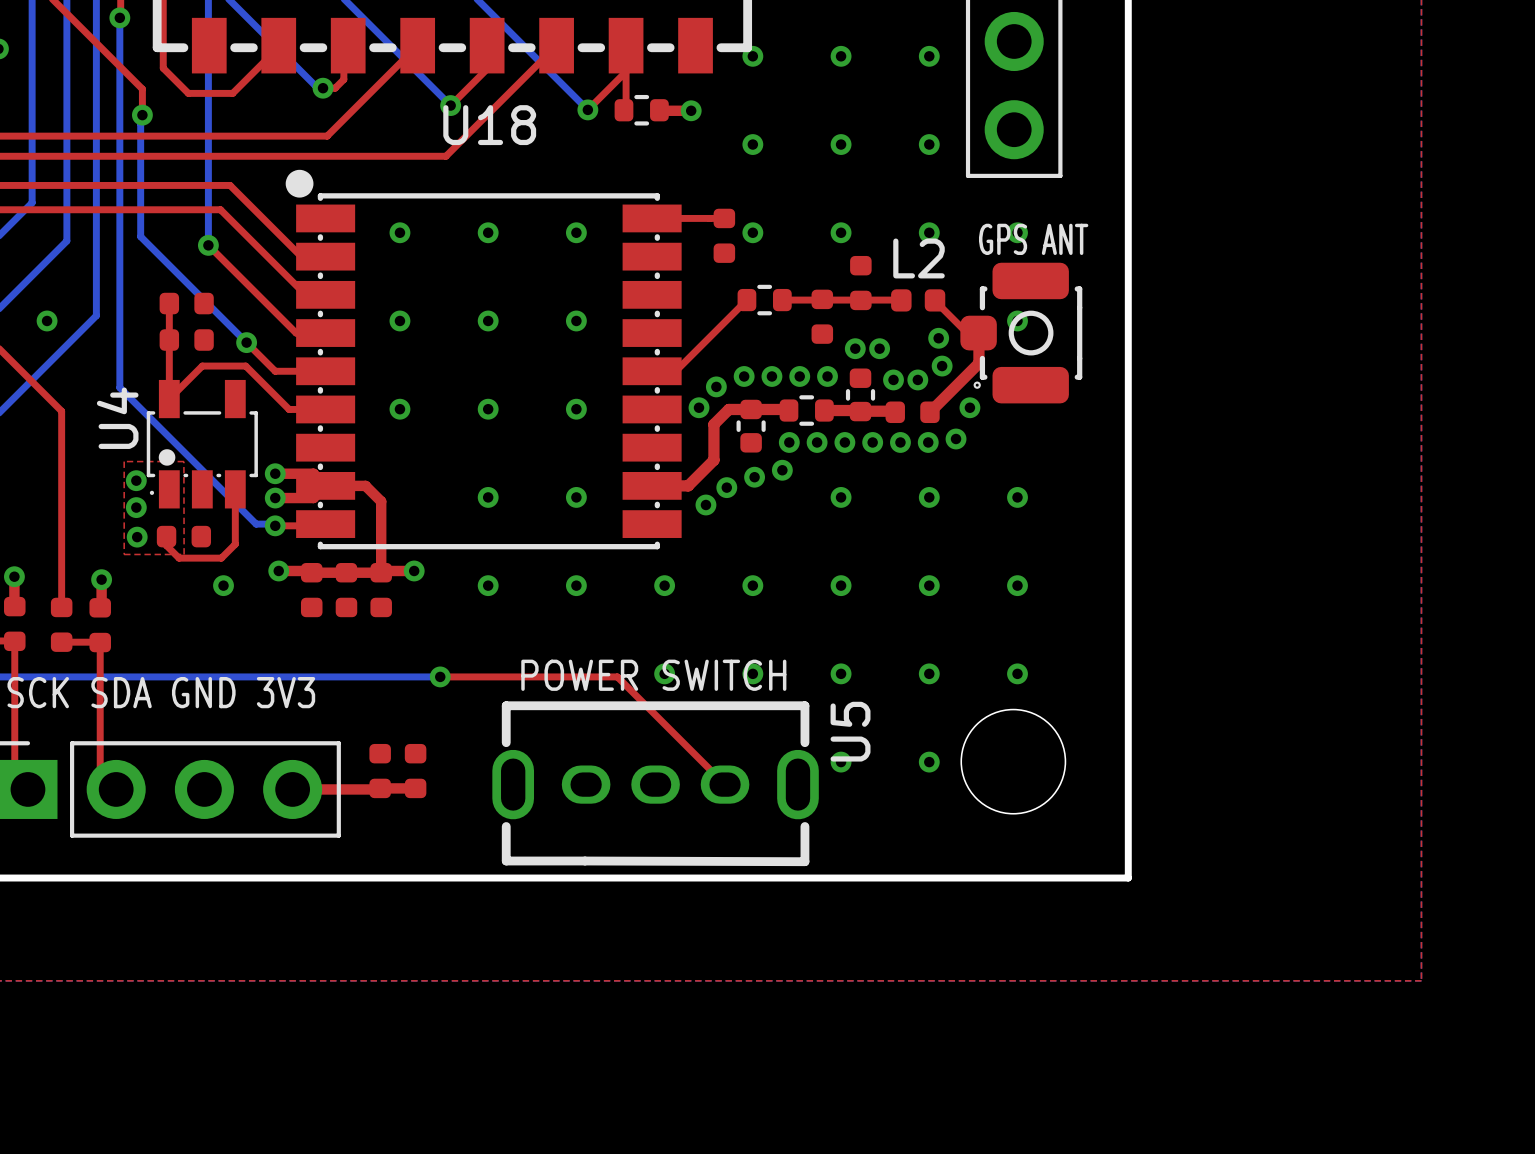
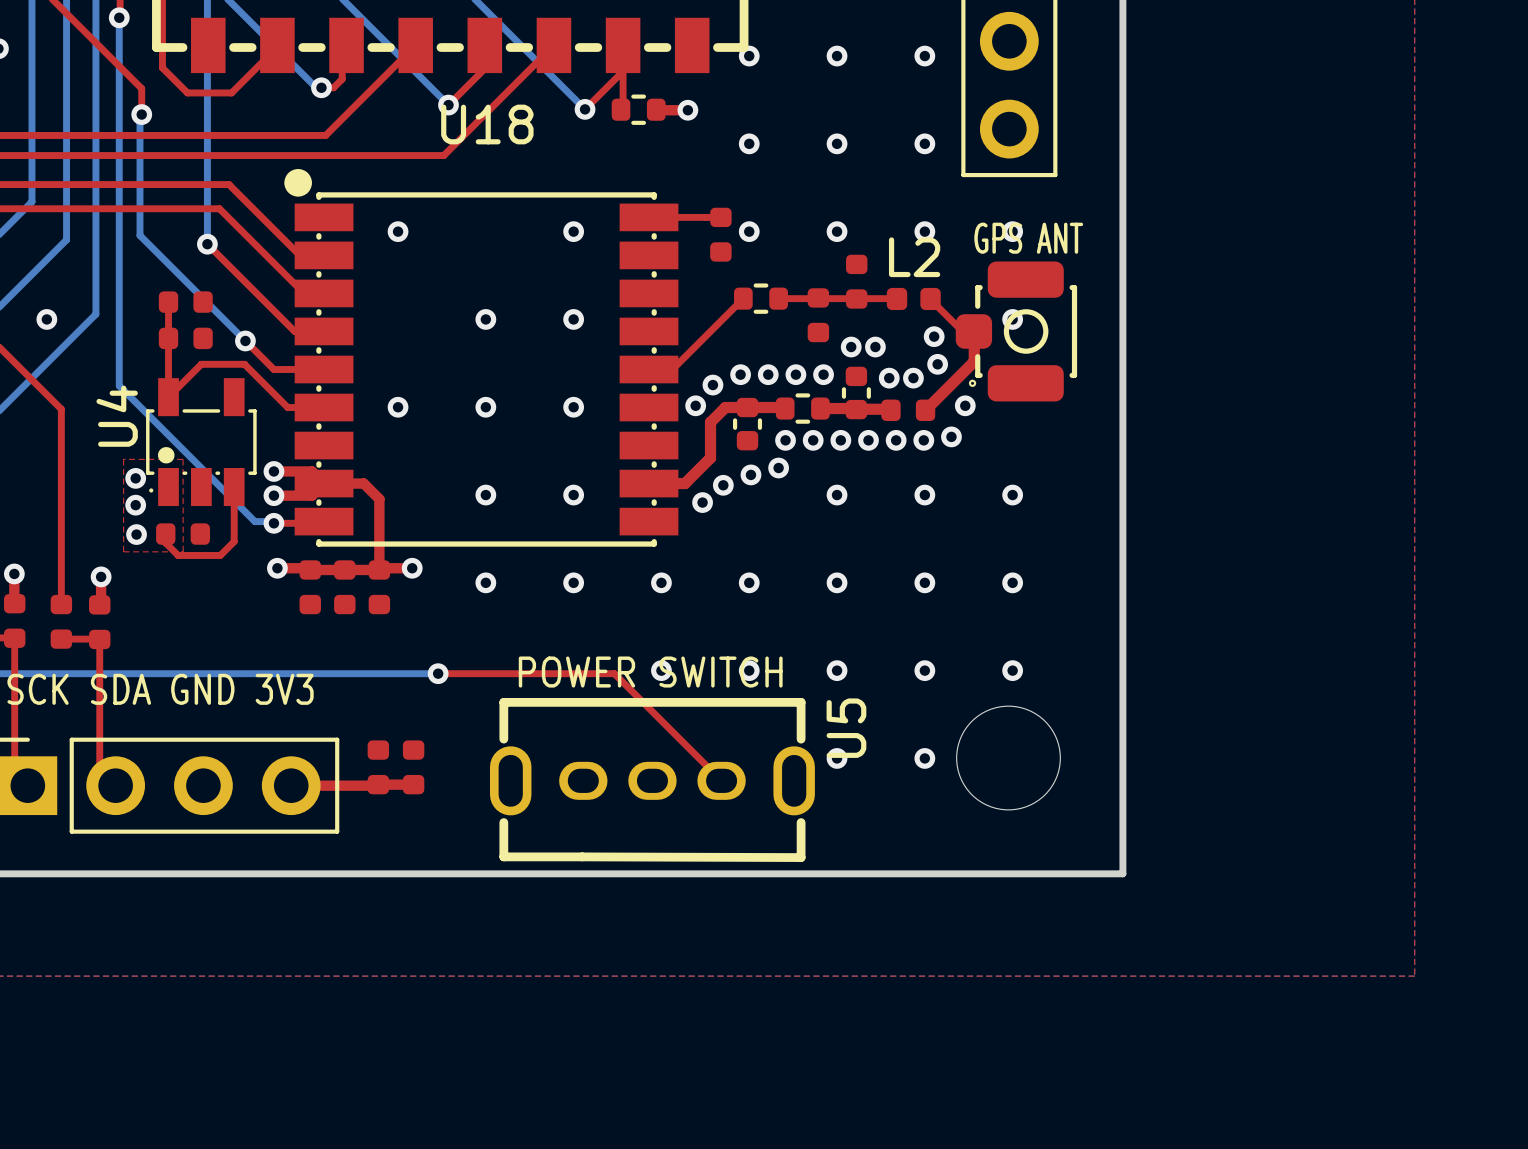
via: (488, 232) -> none
via: (399, 320) -> none
via: (223, 585) -> none

